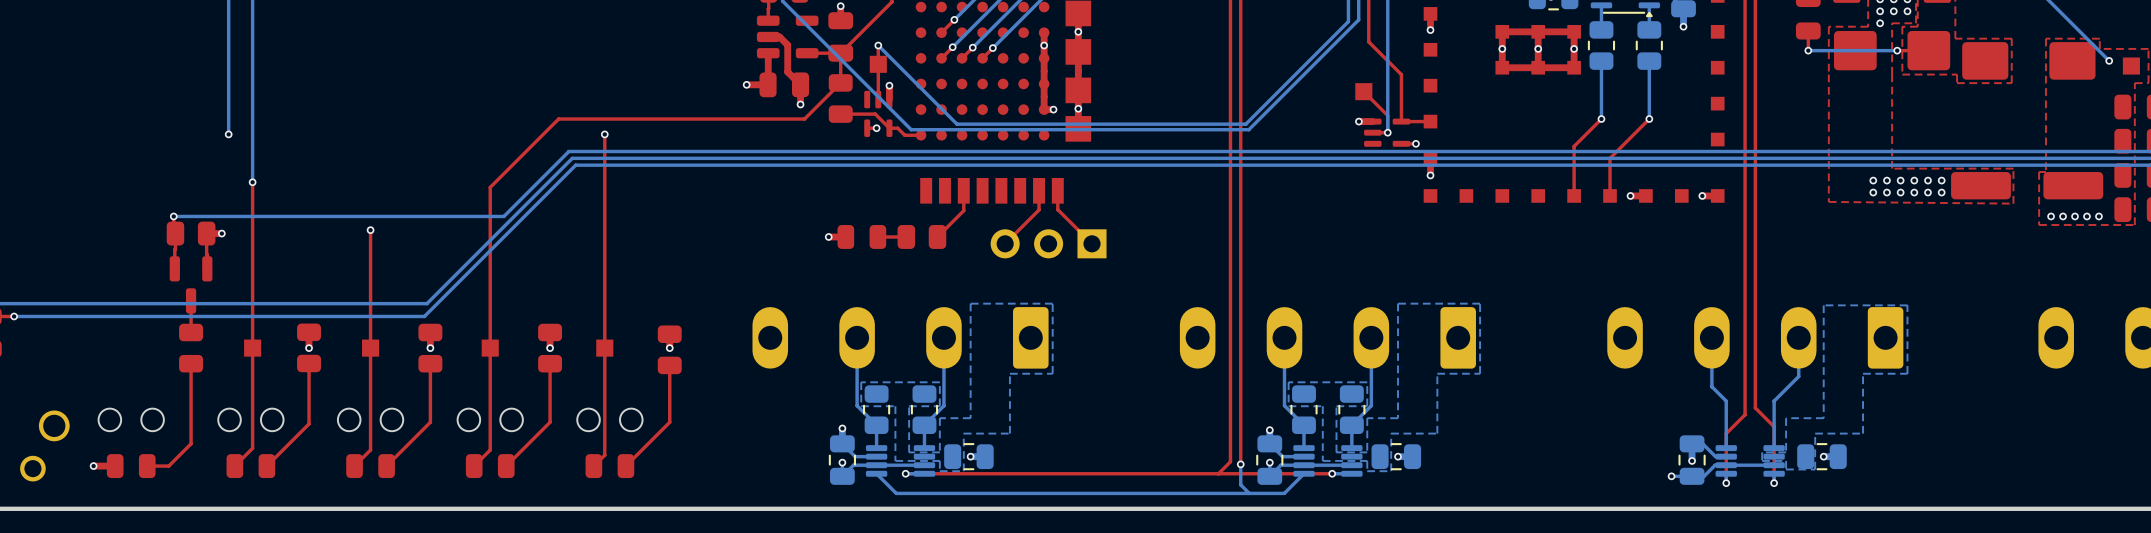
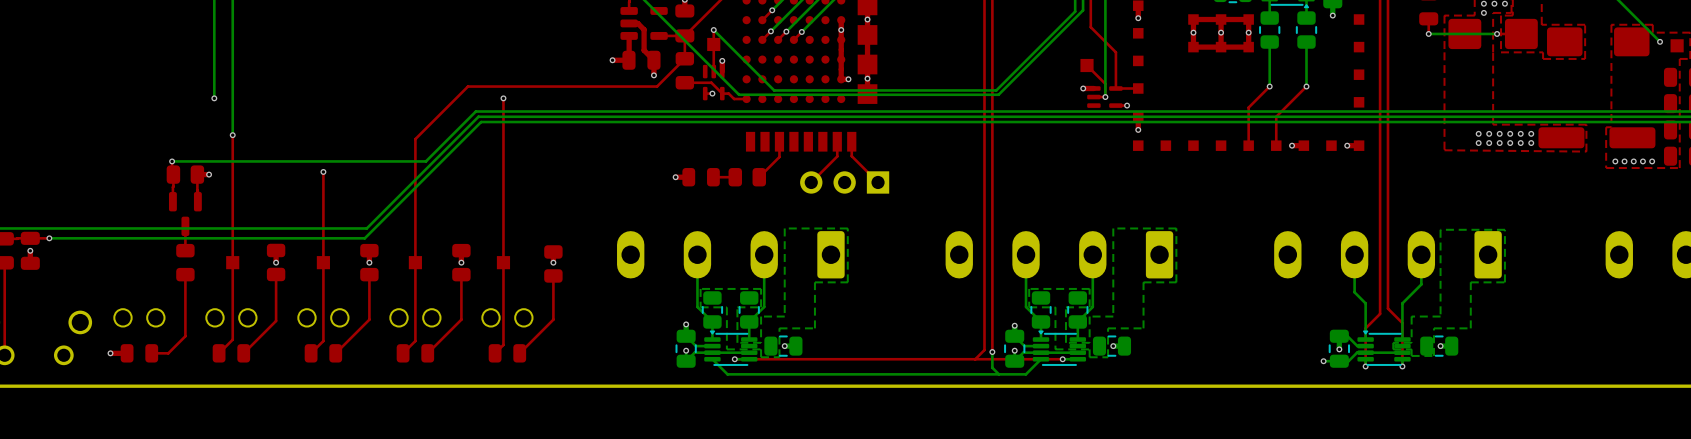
part footprint: [865, 445, 936, 477] -> [704, 330, 758, 366]
part footprint: [1293, 445, 1363, 477] -> [1032, 330, 1087, 366]
part footprint: [1715, 445, 1785, 477] -> [1357, 330, 1411, 366]

